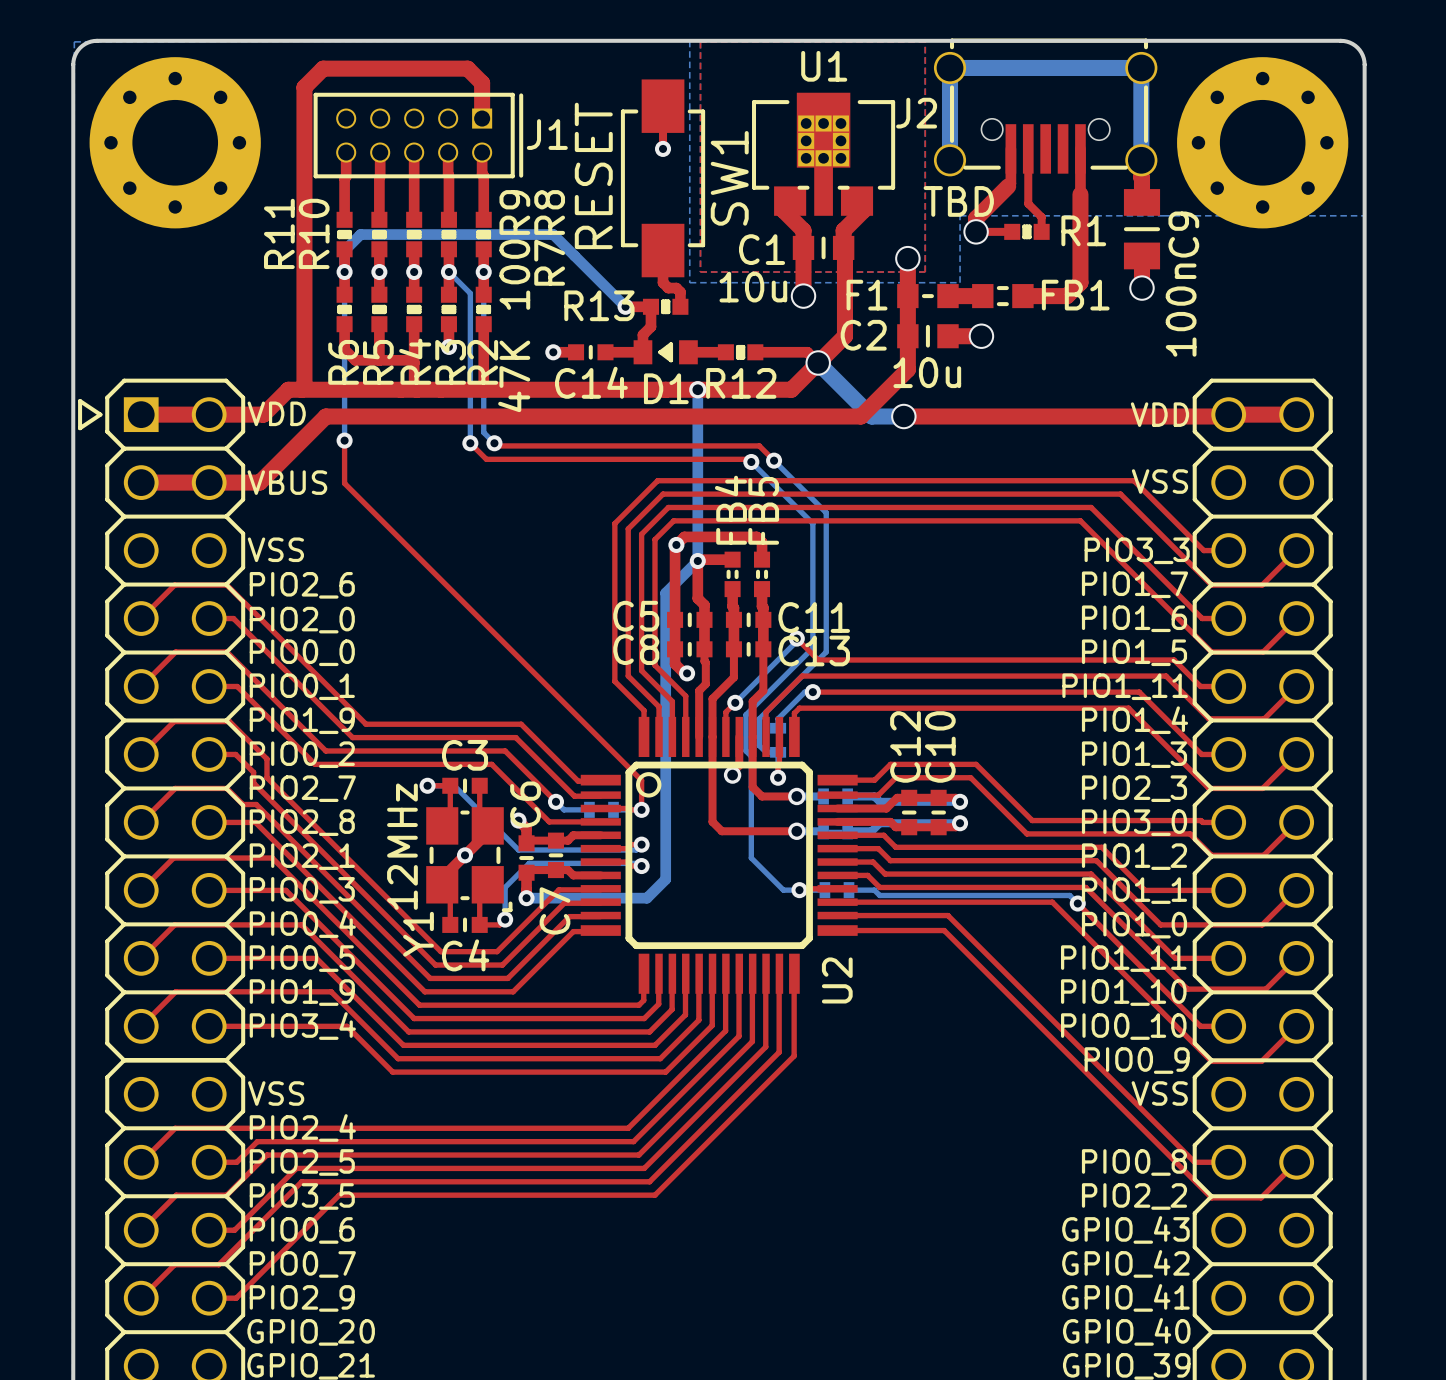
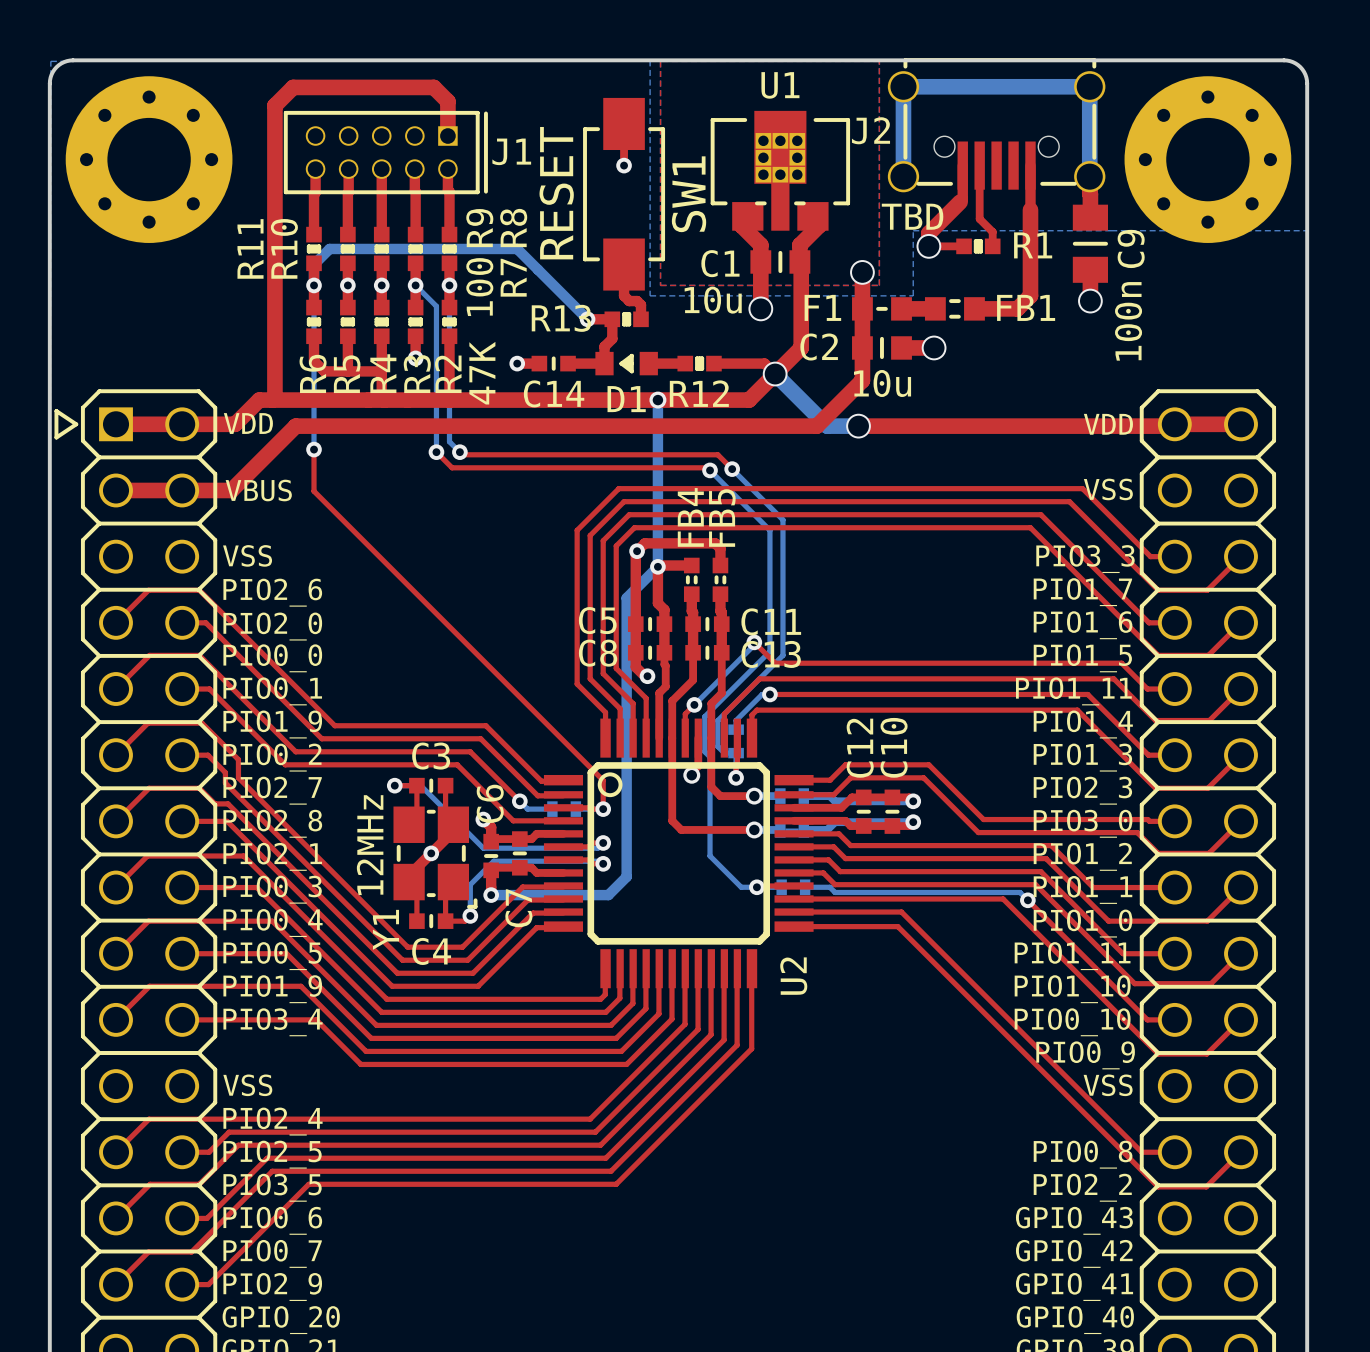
R2 value position: 47K (514, 376) -> 47K (482, 373)

